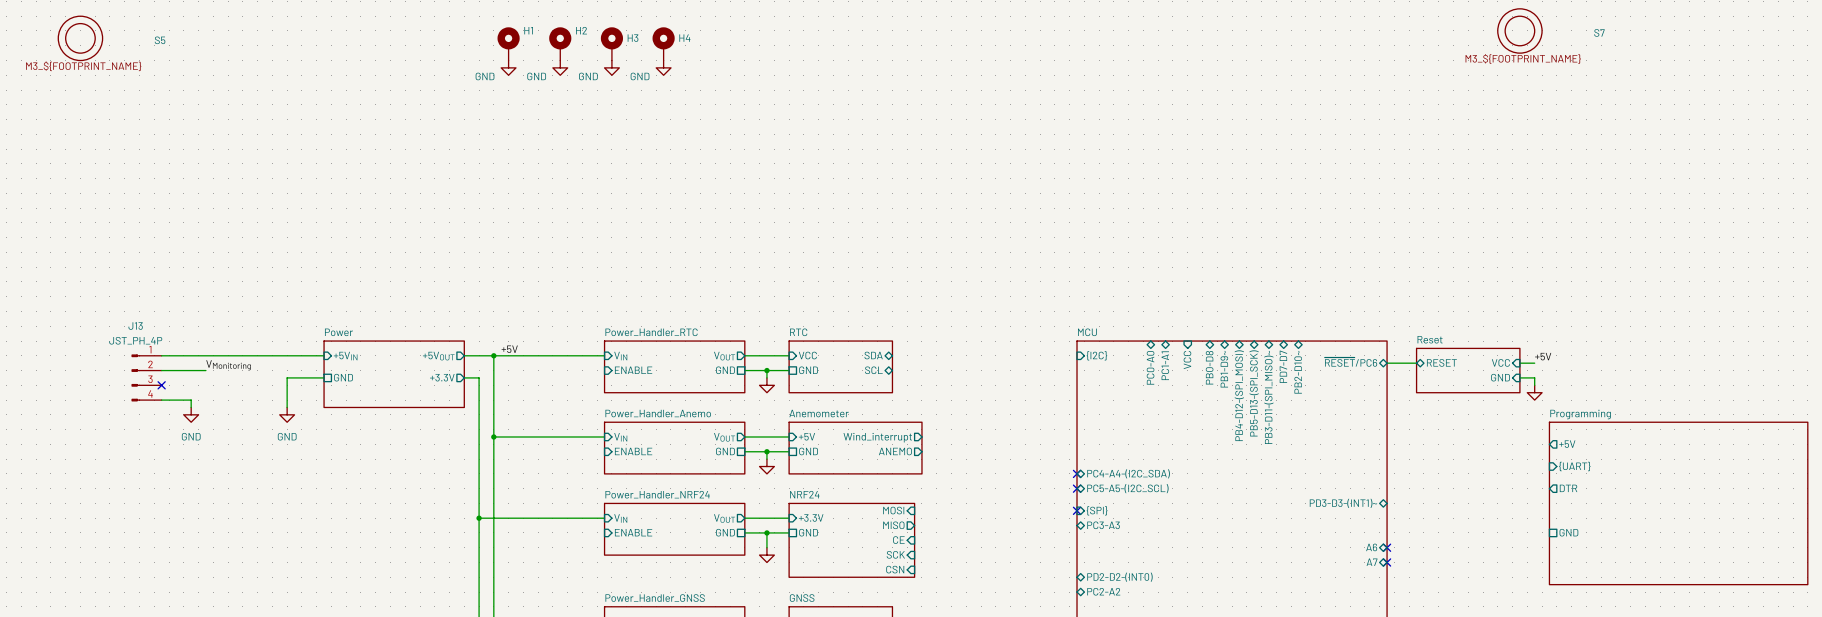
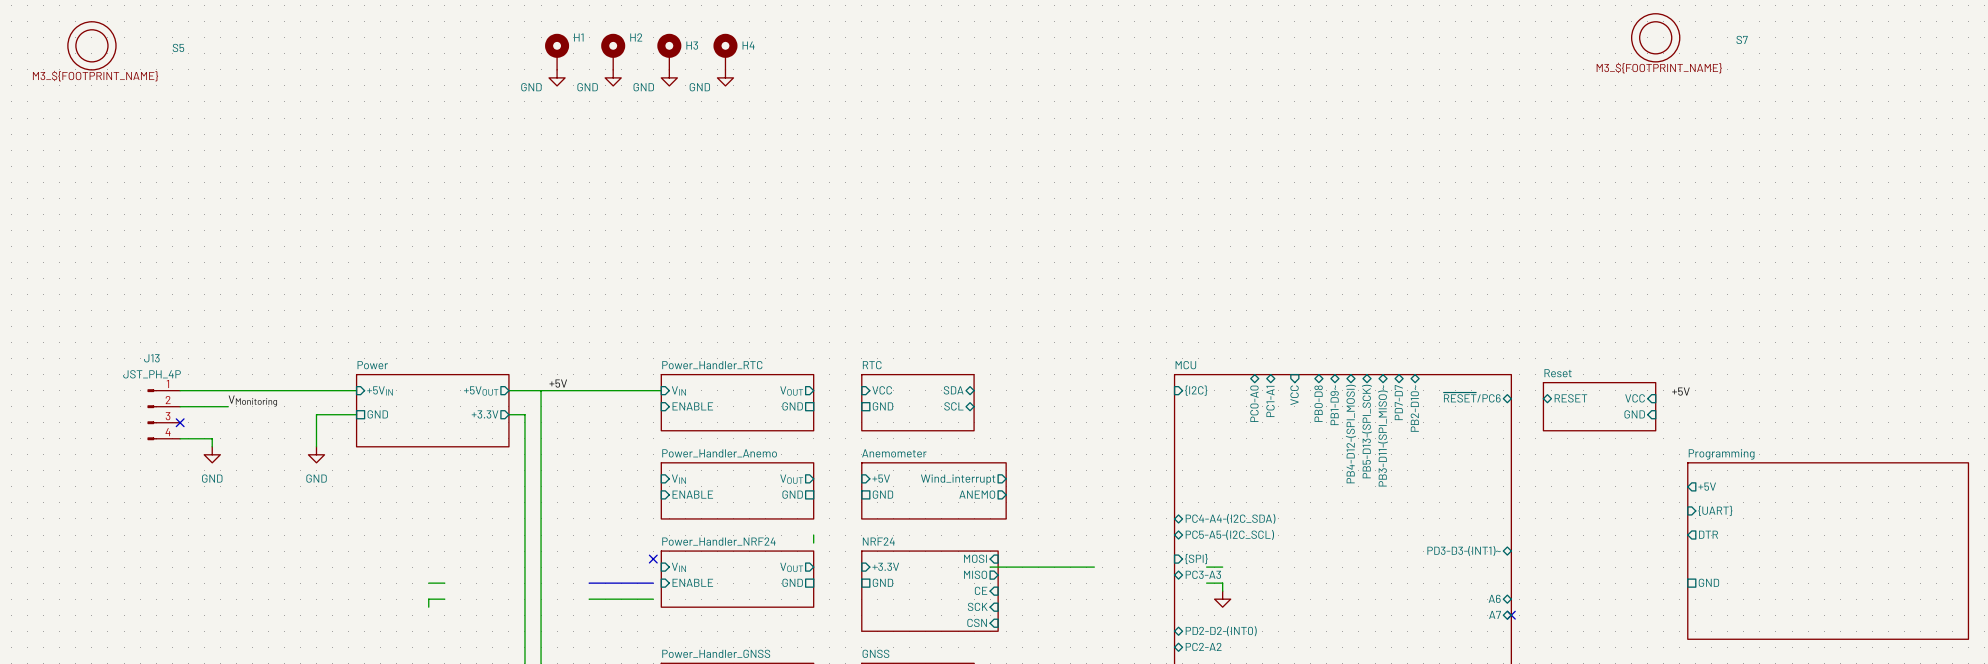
junction: (493, 355) -> none
wire: (744, 355) (789, 355) -> none
wire: (1387, 363) (1416, 363) -> none
wire: (1519, 363) (1534, 363) -> none
wire: (744, 370) (789, 370) -> none
wire: (766, 370) (766, 377) -> none
junction: (766, 370) -> none
wire: (1519, 377) (1534, 377) (1534, 385) -> none
power symbol: (766, 385) -> none
power symbol: (1534, 392) -> none
wire: (493, 436) (604, 436) -> none
junction: (493, 436) -> none
wire: (744, 436) (789, 436) -> none
wire: (744, 451) (789, 451) -> none
wire: (766, 451) (766, 459) -> (813, 535) (813, 543)
junction: (766, 451) -> none
power symbol: (766, 466) -> none
no-connect mark: (1077, 473) -> none
no-connect mark: (1077, 488) -> none
no-connect mark: none -> (653, 559)
no-connect mark: (1077, 510) -> none
wire: (479, 518) (604, 518) -> none
junction: (479, 518) -> none
wire: (744, 518) (789, 518) -> none
wire: none -> (990, 567) (1094, 567)
wire: none -> (1206, 567) (1222, 567)
wire: none -> (428, 583) (444, 583)
bus: none -> (589, 583) (653, 583)
wire: (744, 532) (789, 532) -> none
wire: (766, 532) (766, 547) -> none
junction: (766, 532) -> none
wire: none -> (1206, 583) (1222, 583) (1222, 591)
wire: none -> (444, 599) (428, 599) (428, 607)
wire: none -> (589, 599) (653, 599)
power symbol: none -> (1222, 599)
no-connect mark: (1387, 547) -> none
power symbol: (766, 555) -> none

